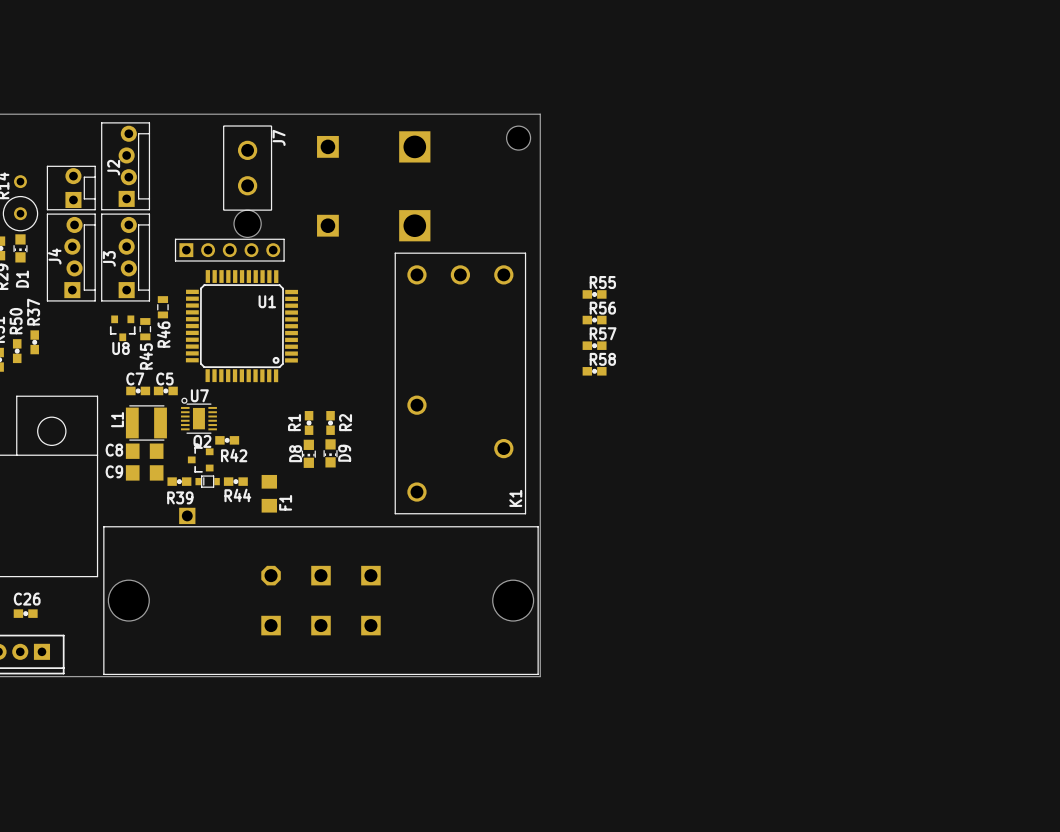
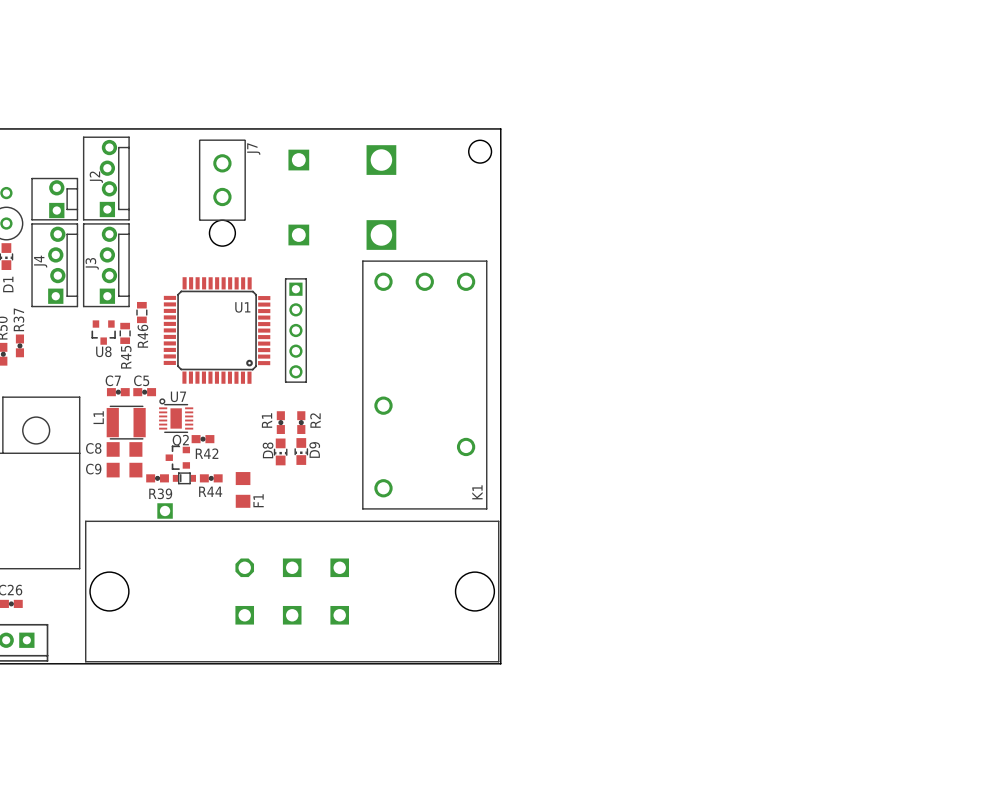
part rotation: 0° (229, 250) -> 90° clockwise (295, 330)
part position: (229, 250) -> (295, 330)
R55: (594, 294) -> none
R56: (594, 320) -> none
R57: (594, 345) -> none
R58: (594, 371) -> none

